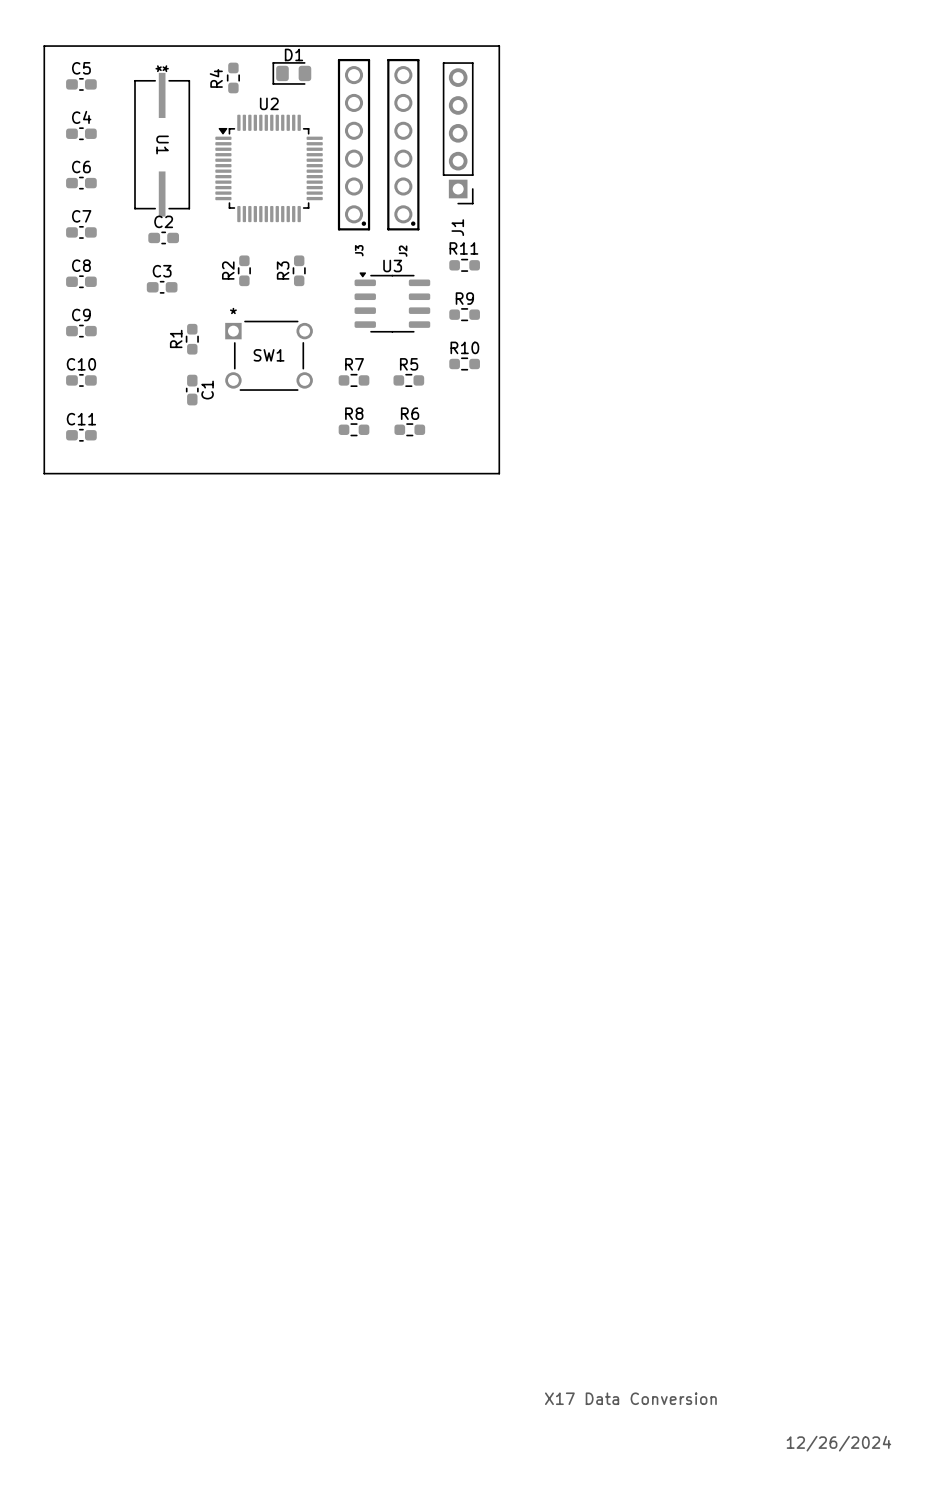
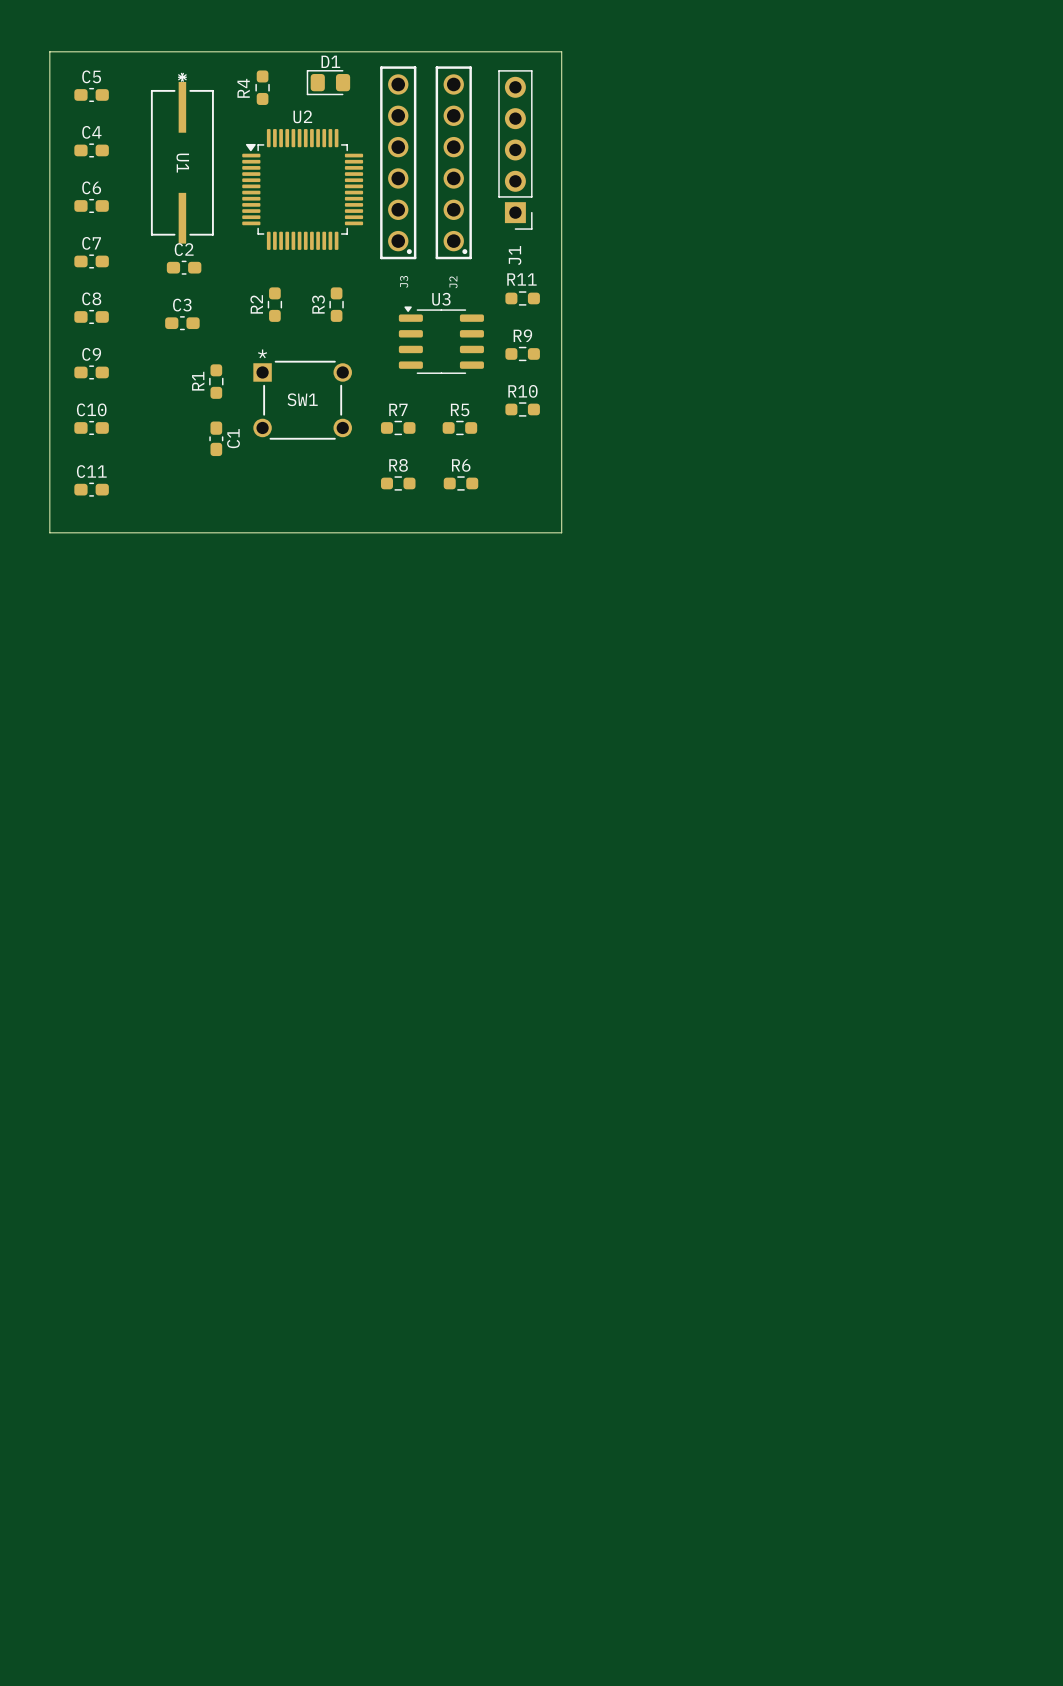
text: X17 Data Conversion (630, 1398) -> none
text: 12/26/2024 (838, 1443) -> none

